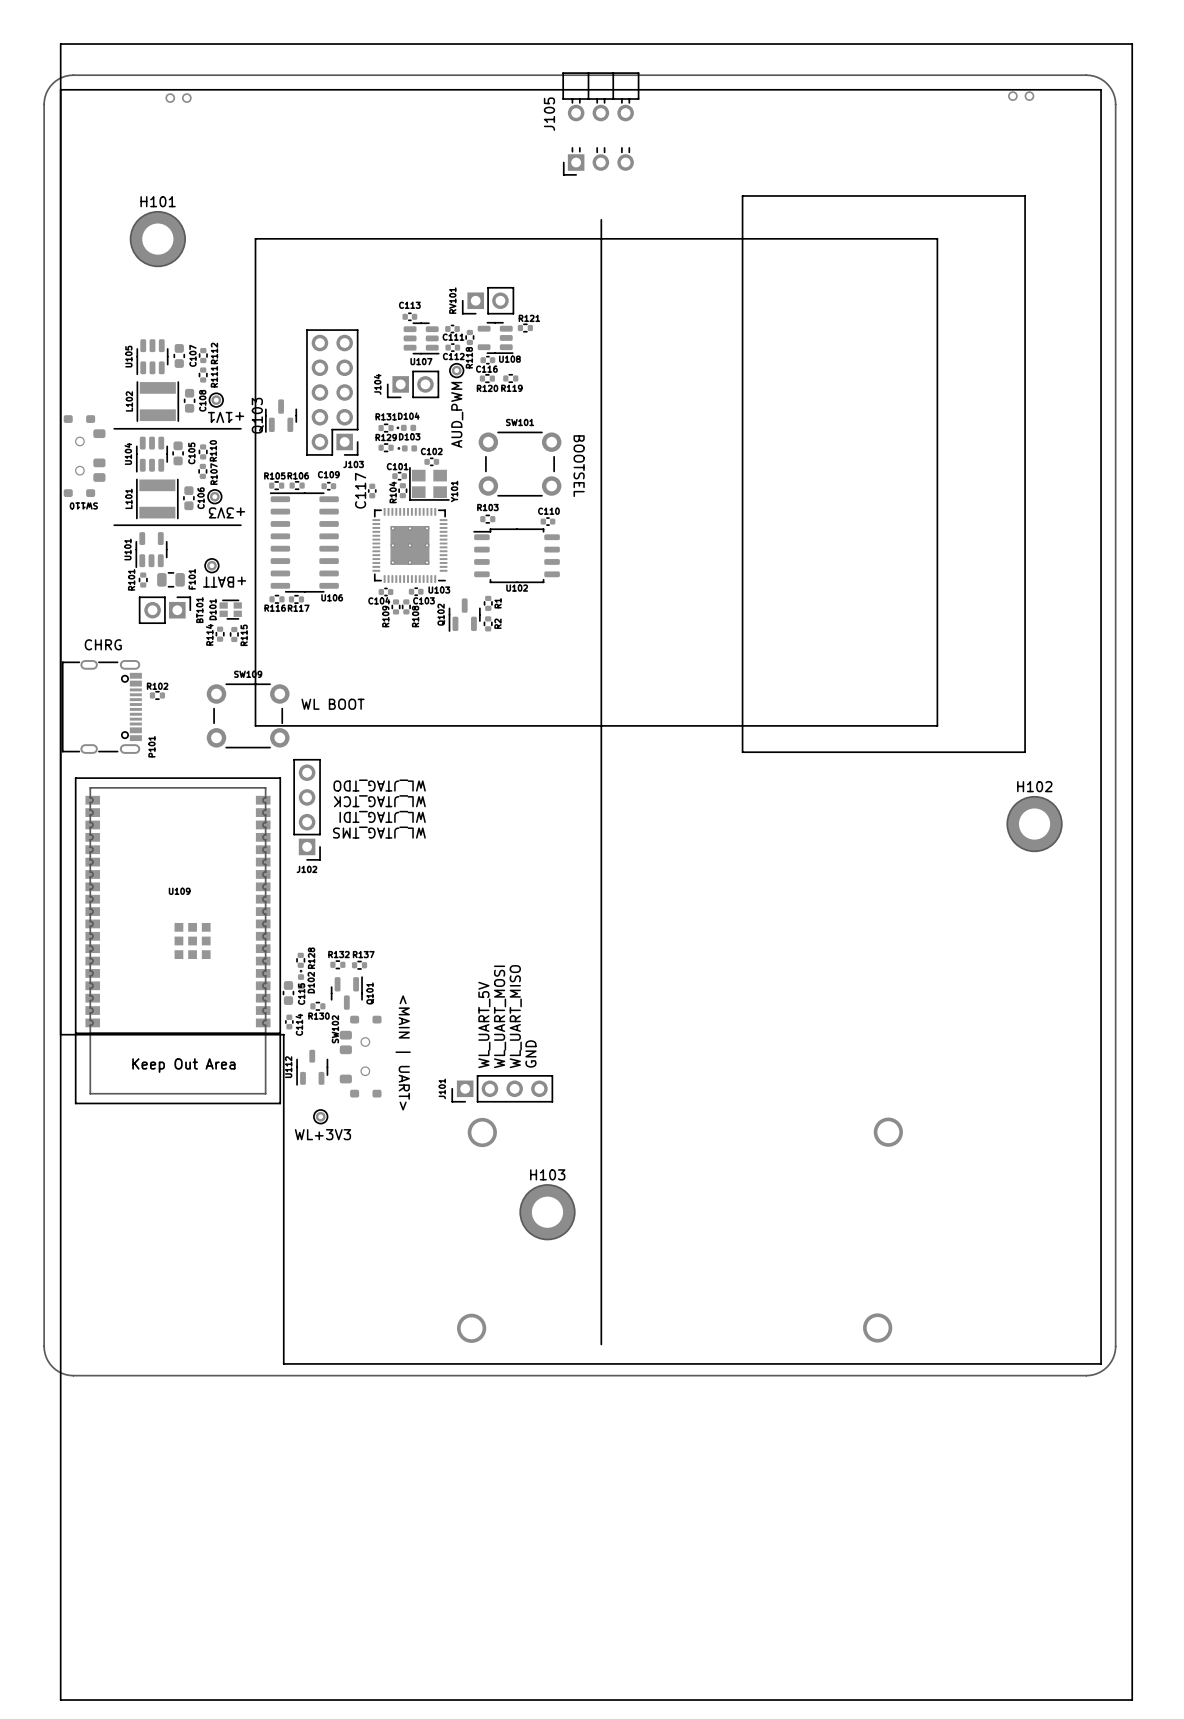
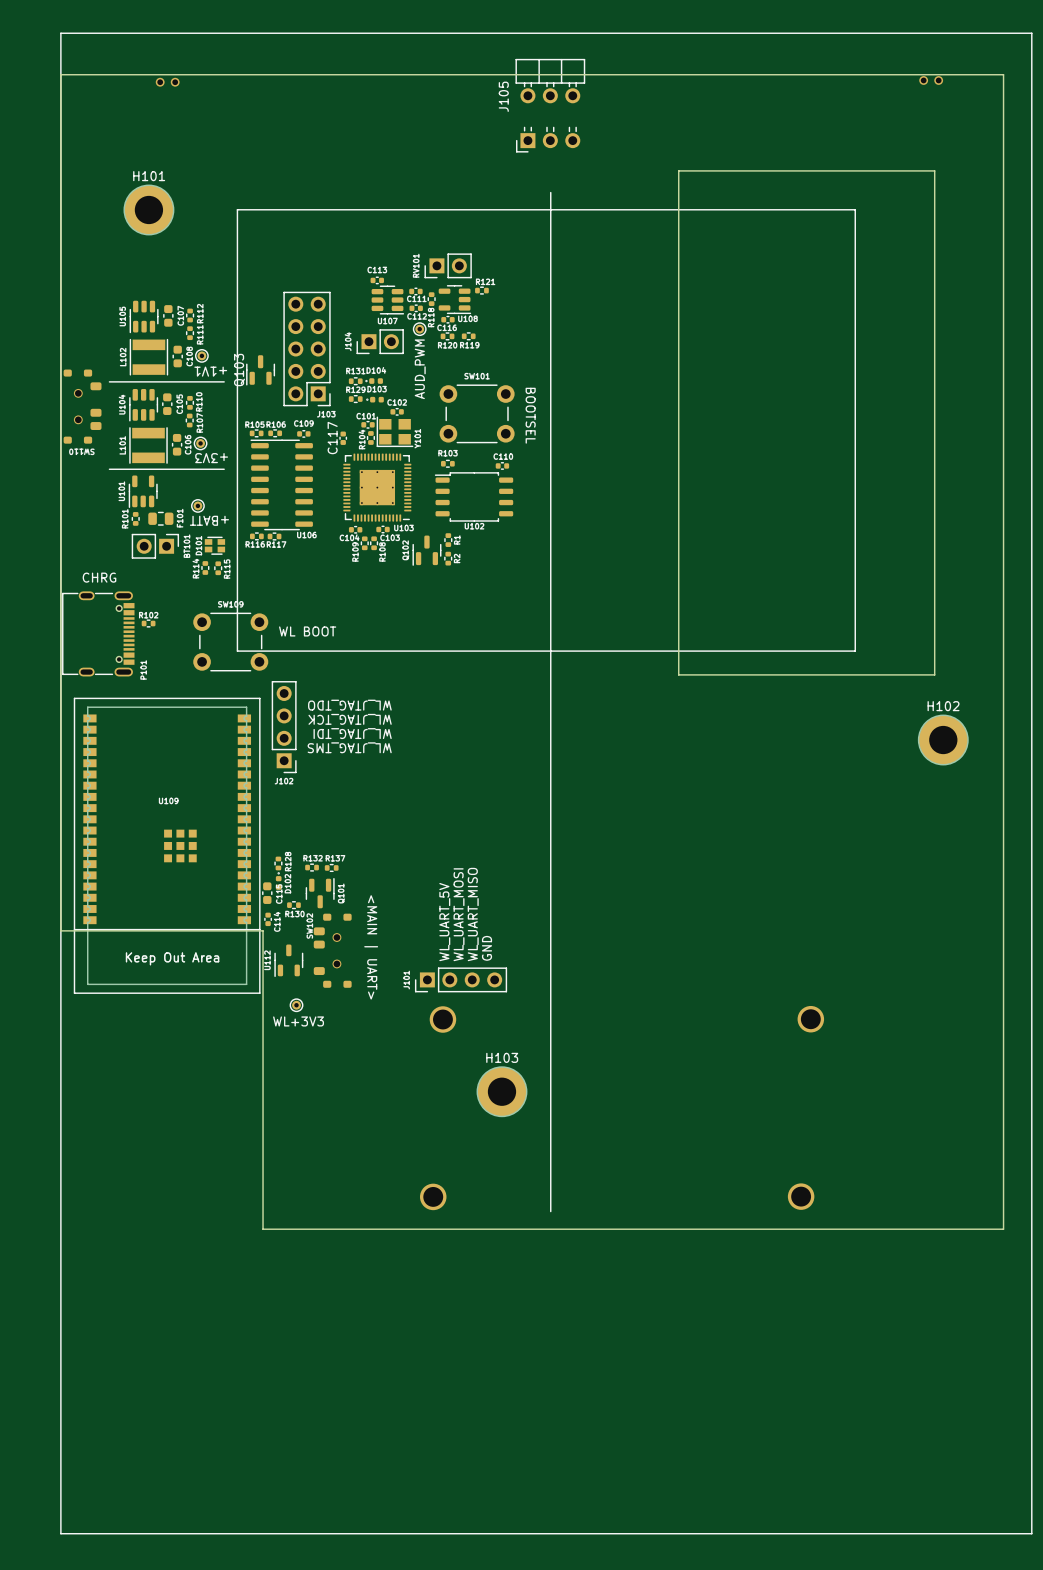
line: (73, 75) (1086, 75) (1097, 77) (1109, 86) (1115, 104) (1115, 1346) (1111, 1361) (1104, 1369) (1086, 1375) (73, 1375) (58, 1371) (50, 1364) (44, 1346) (44, 104) (46, 93) (52, 83) (62, 77) (73, 75) -> none

